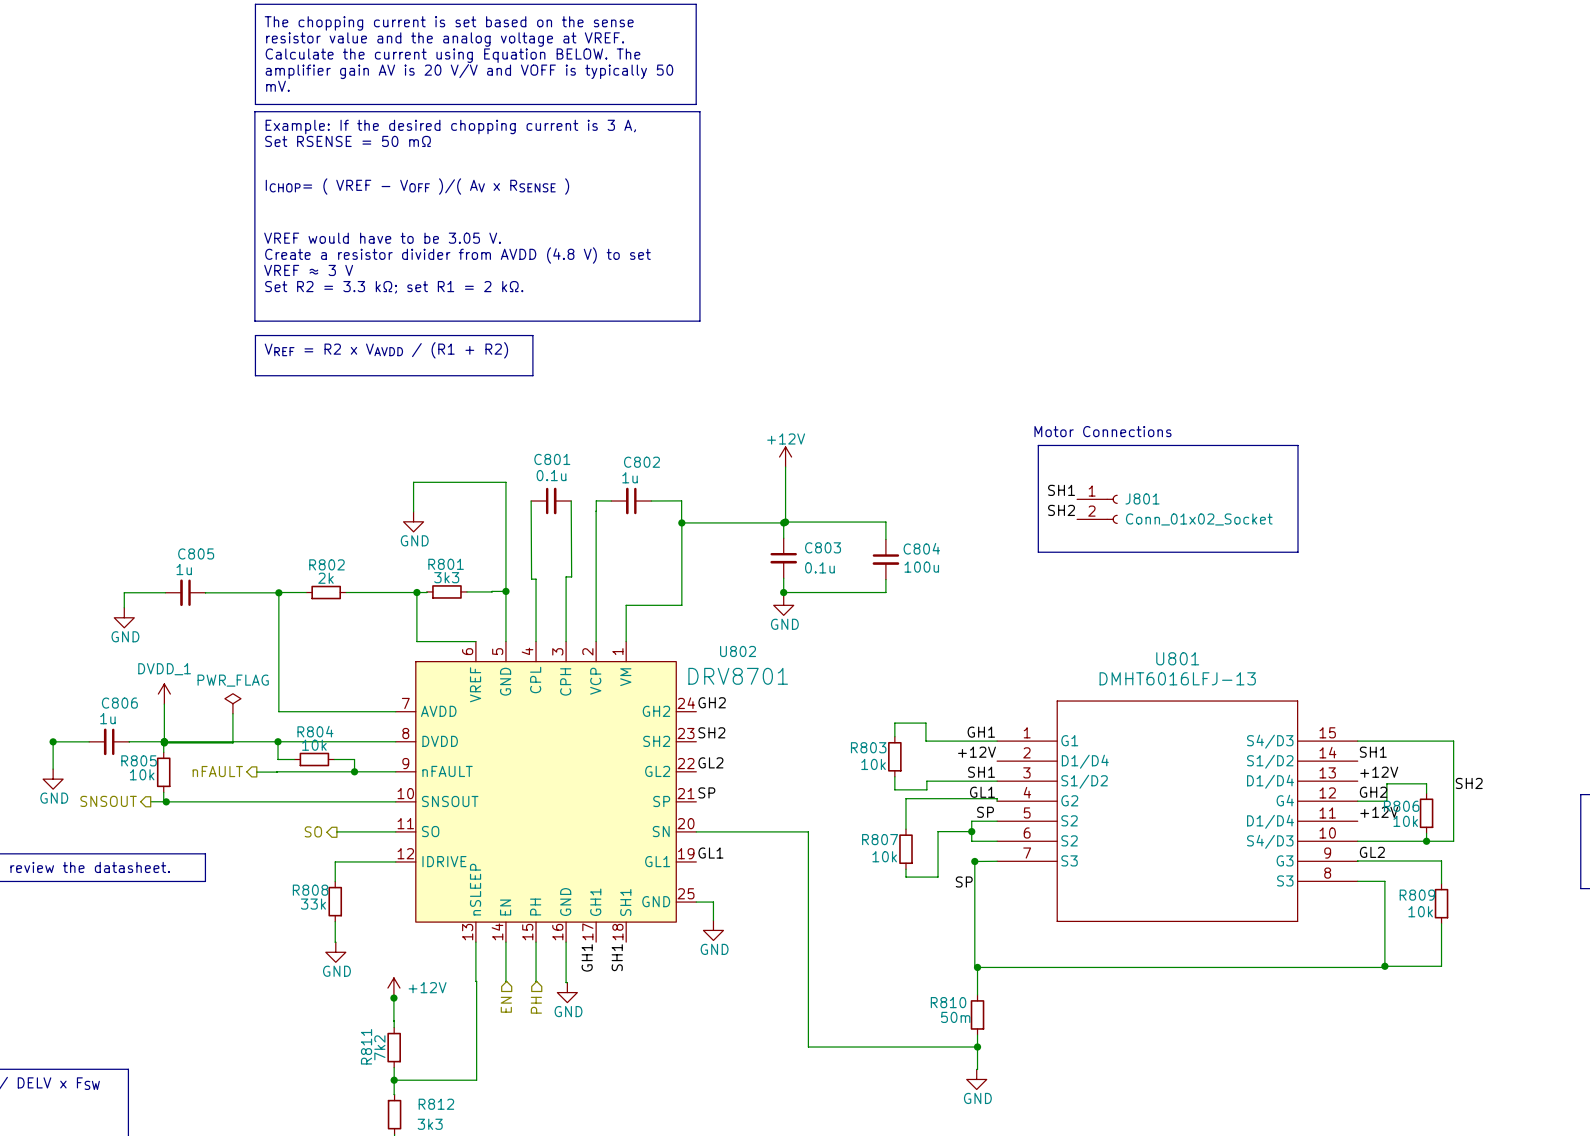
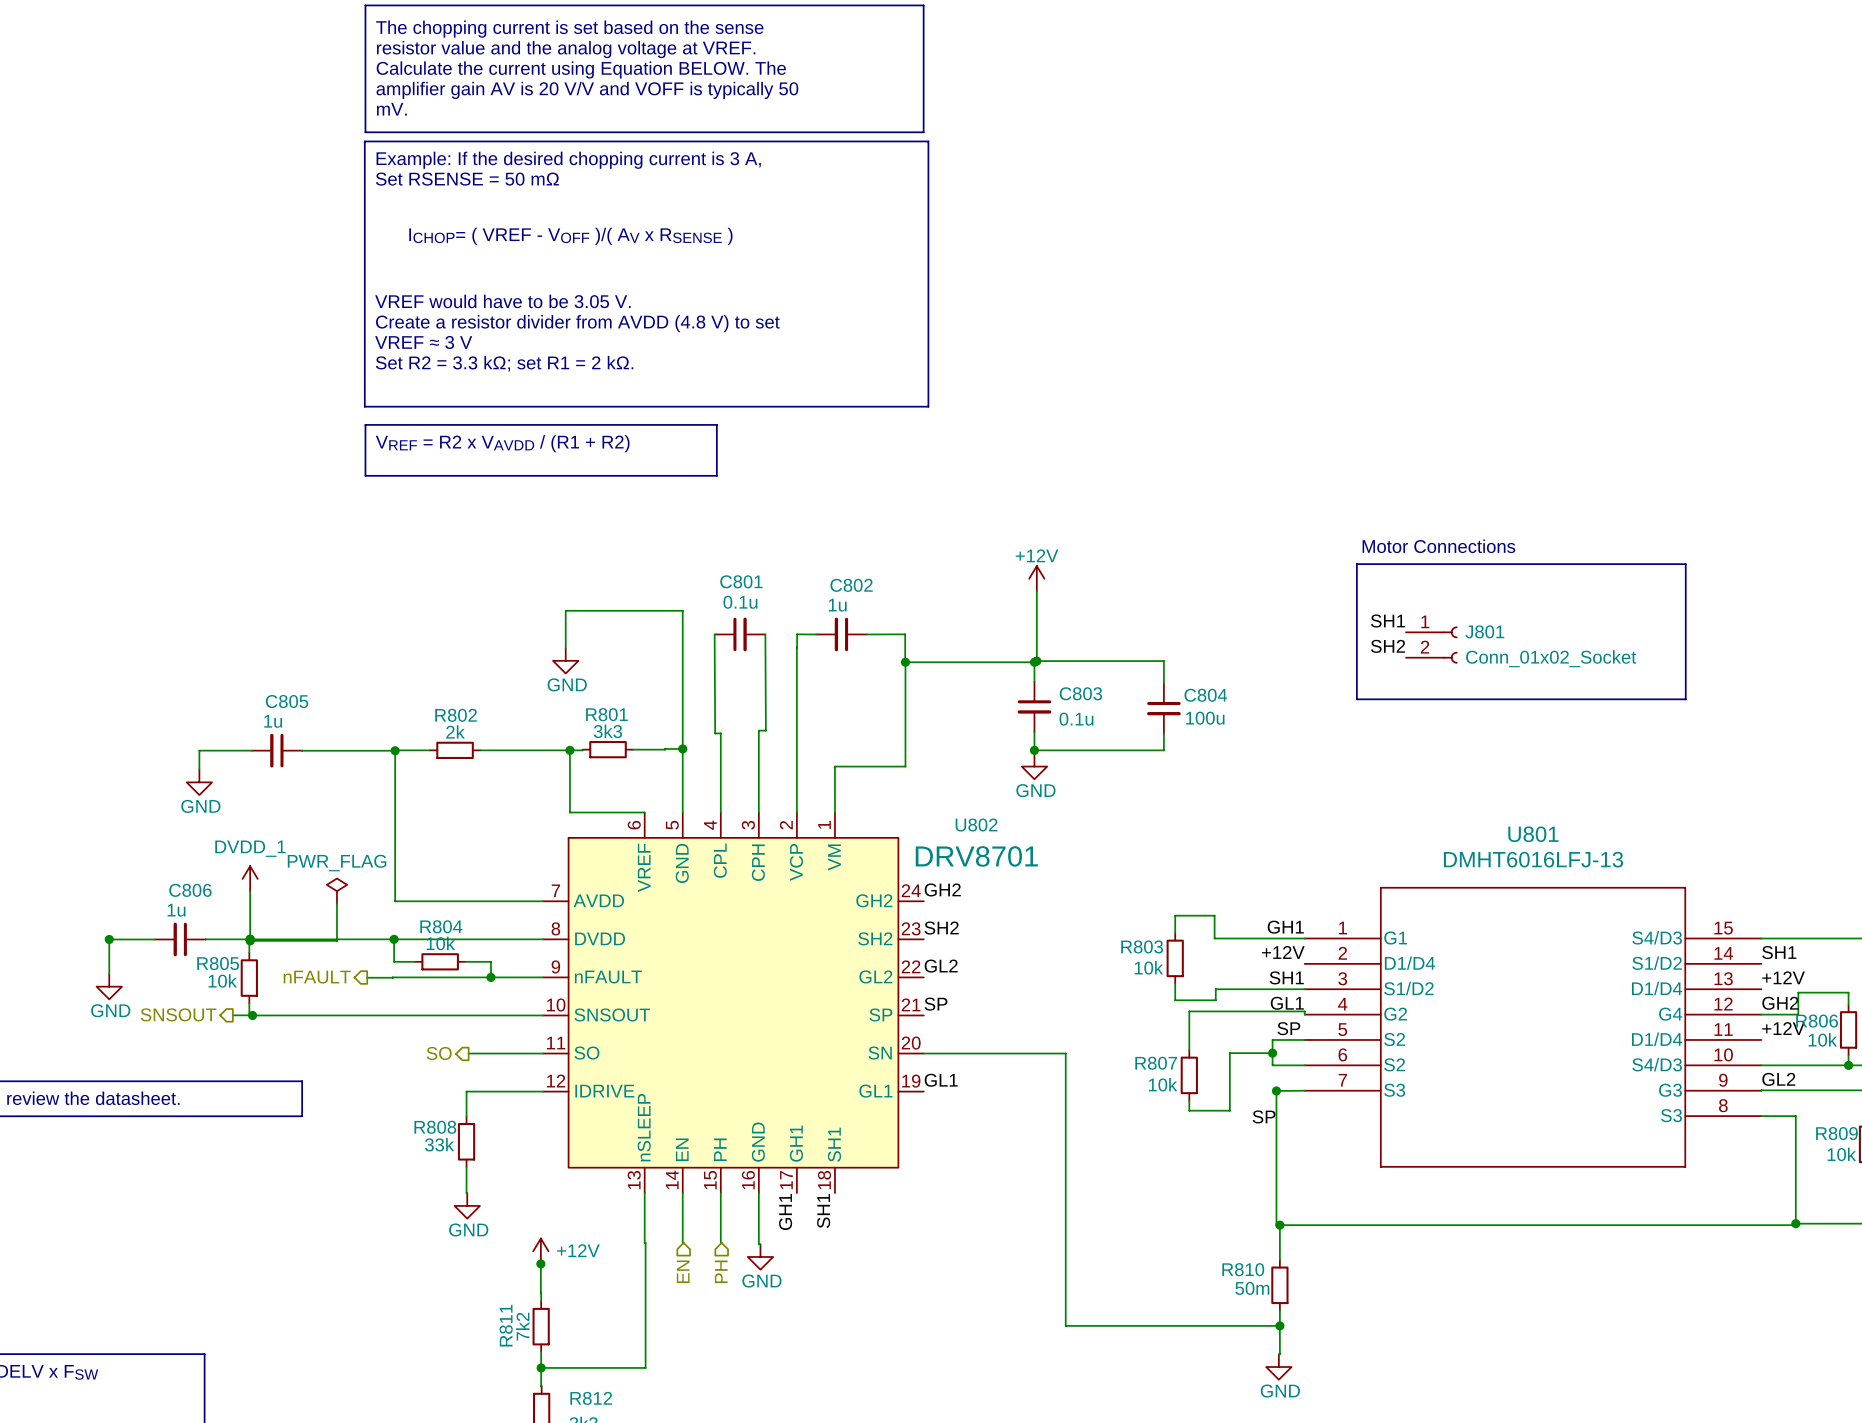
U802 symbol: [395, 641, 697, 943] -> [543, 812, 924, 1194]
wire: (696, 902) (713, 902) (713, 920) -> none
power symbol: GND (713, 930) -> none

